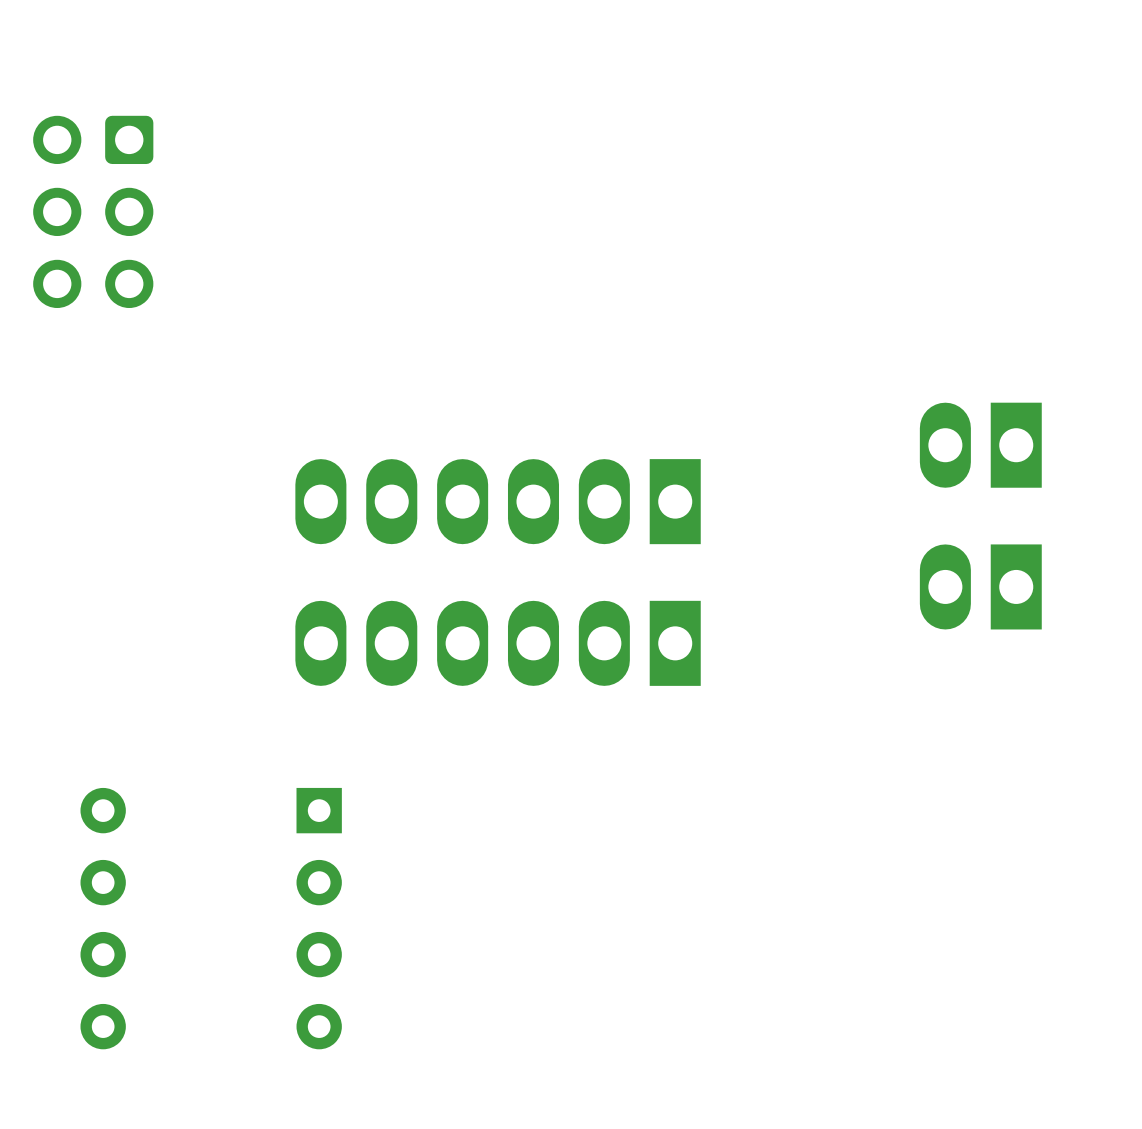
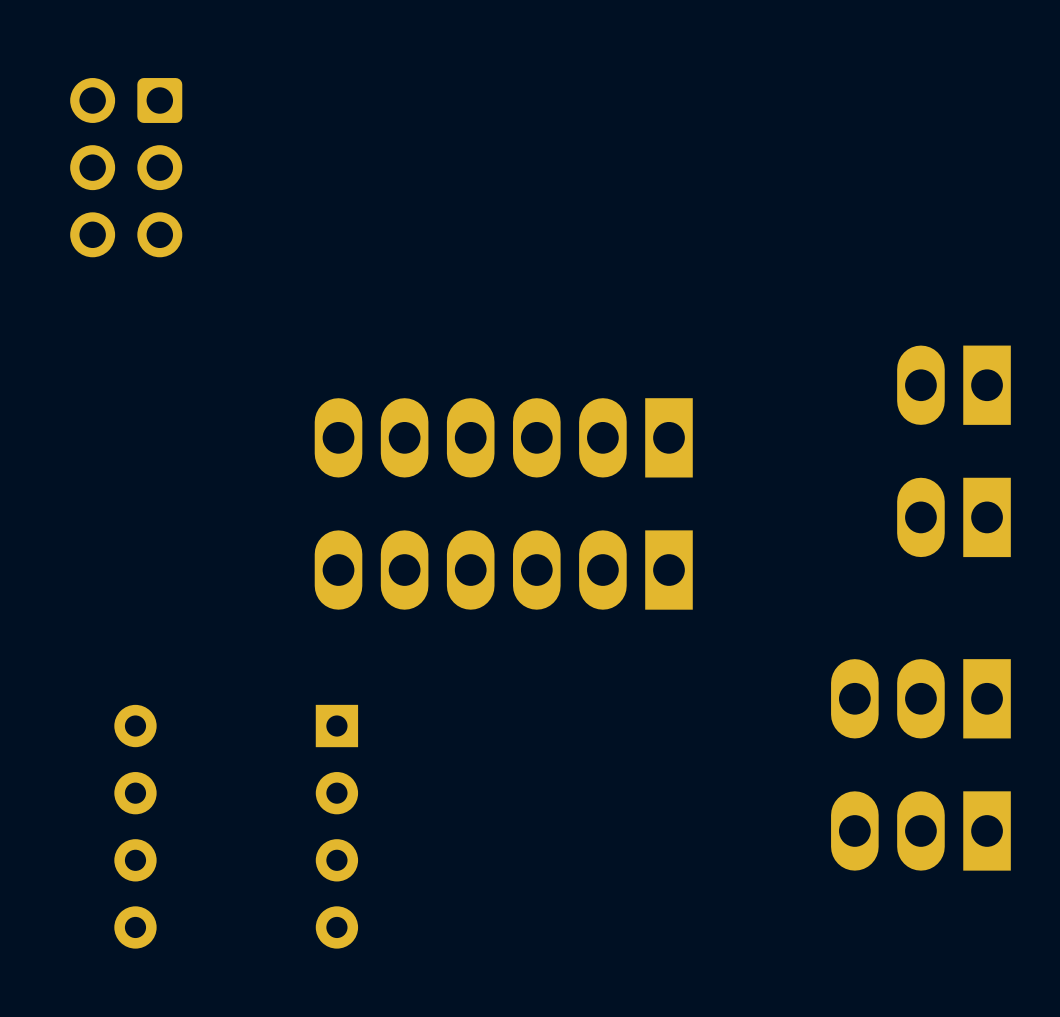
part: none -> (920, 764)

